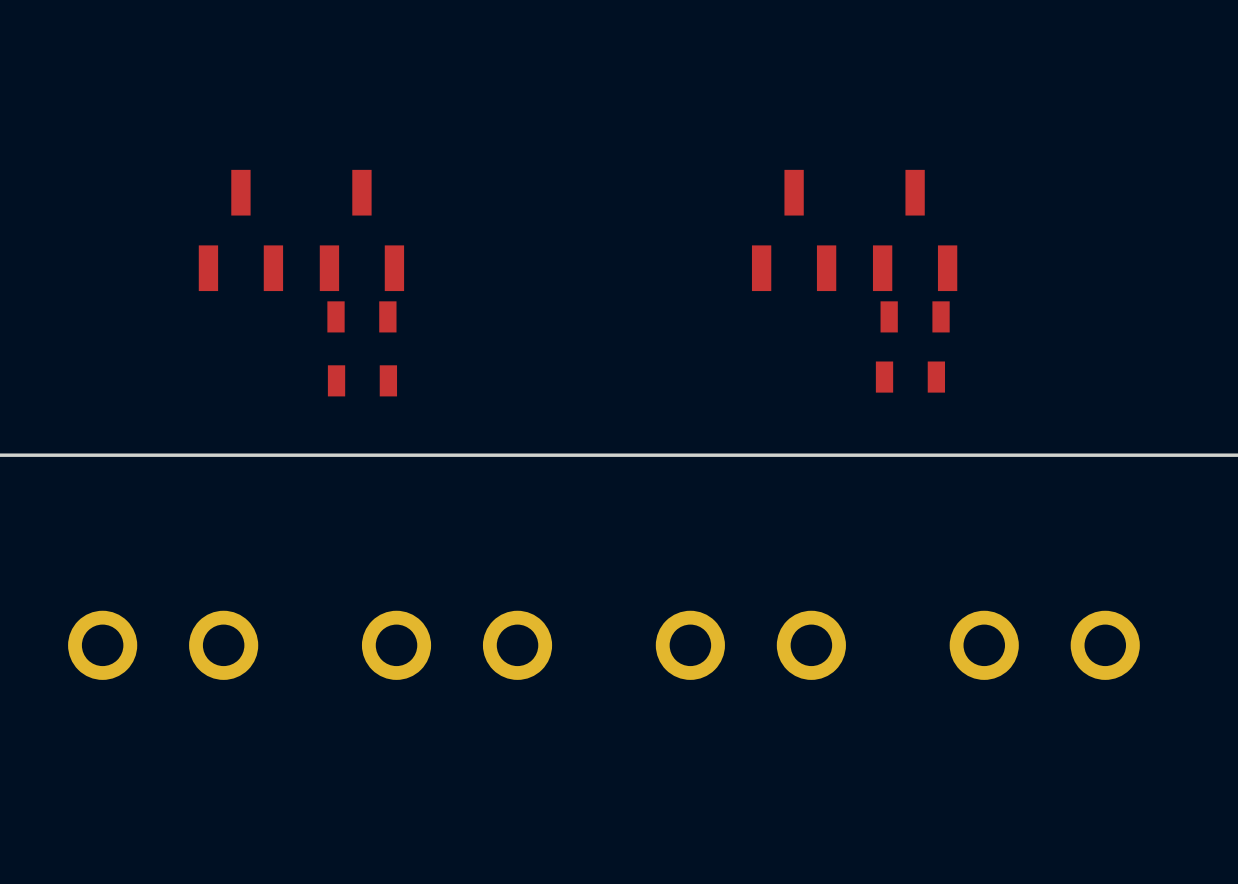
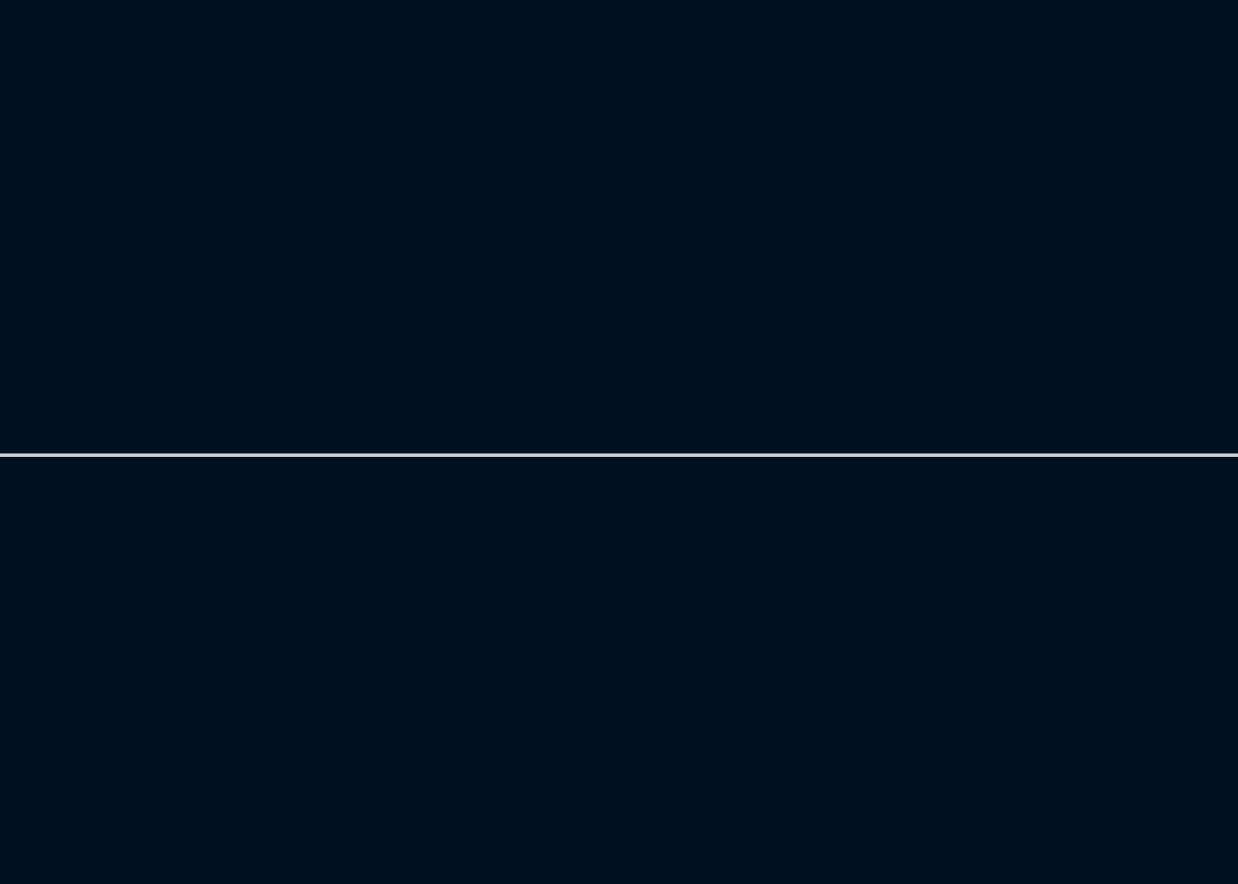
part: (240, 230) -> none
part: (361, 230) -> none
part: (794, 230) -> none
part: (915, 230) -> none
part: (361, 316) -> none
part: (915, 316) -> none
part: (910, 377) -> none
part: (362, 380) -> none
part: (163, 645) -> none
part: (457, 645) -> none
part: (750, 645) -> none
part: (1044, 645) -> none

